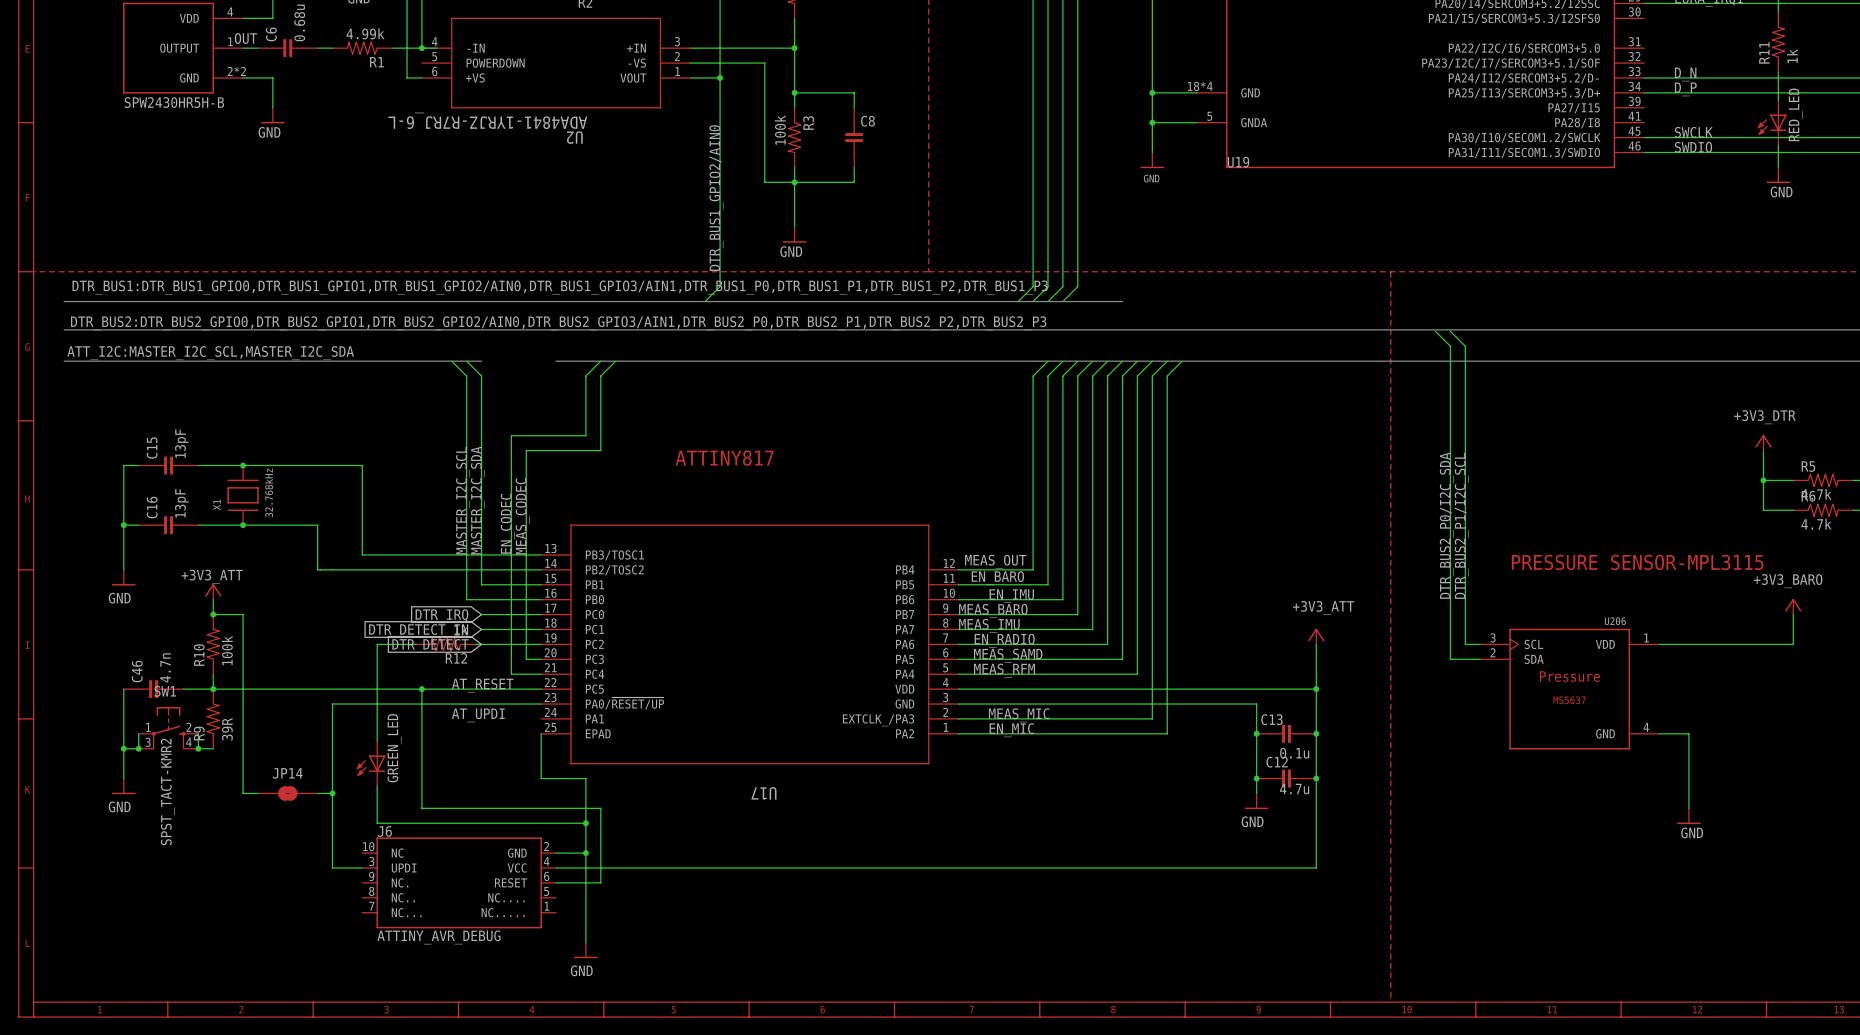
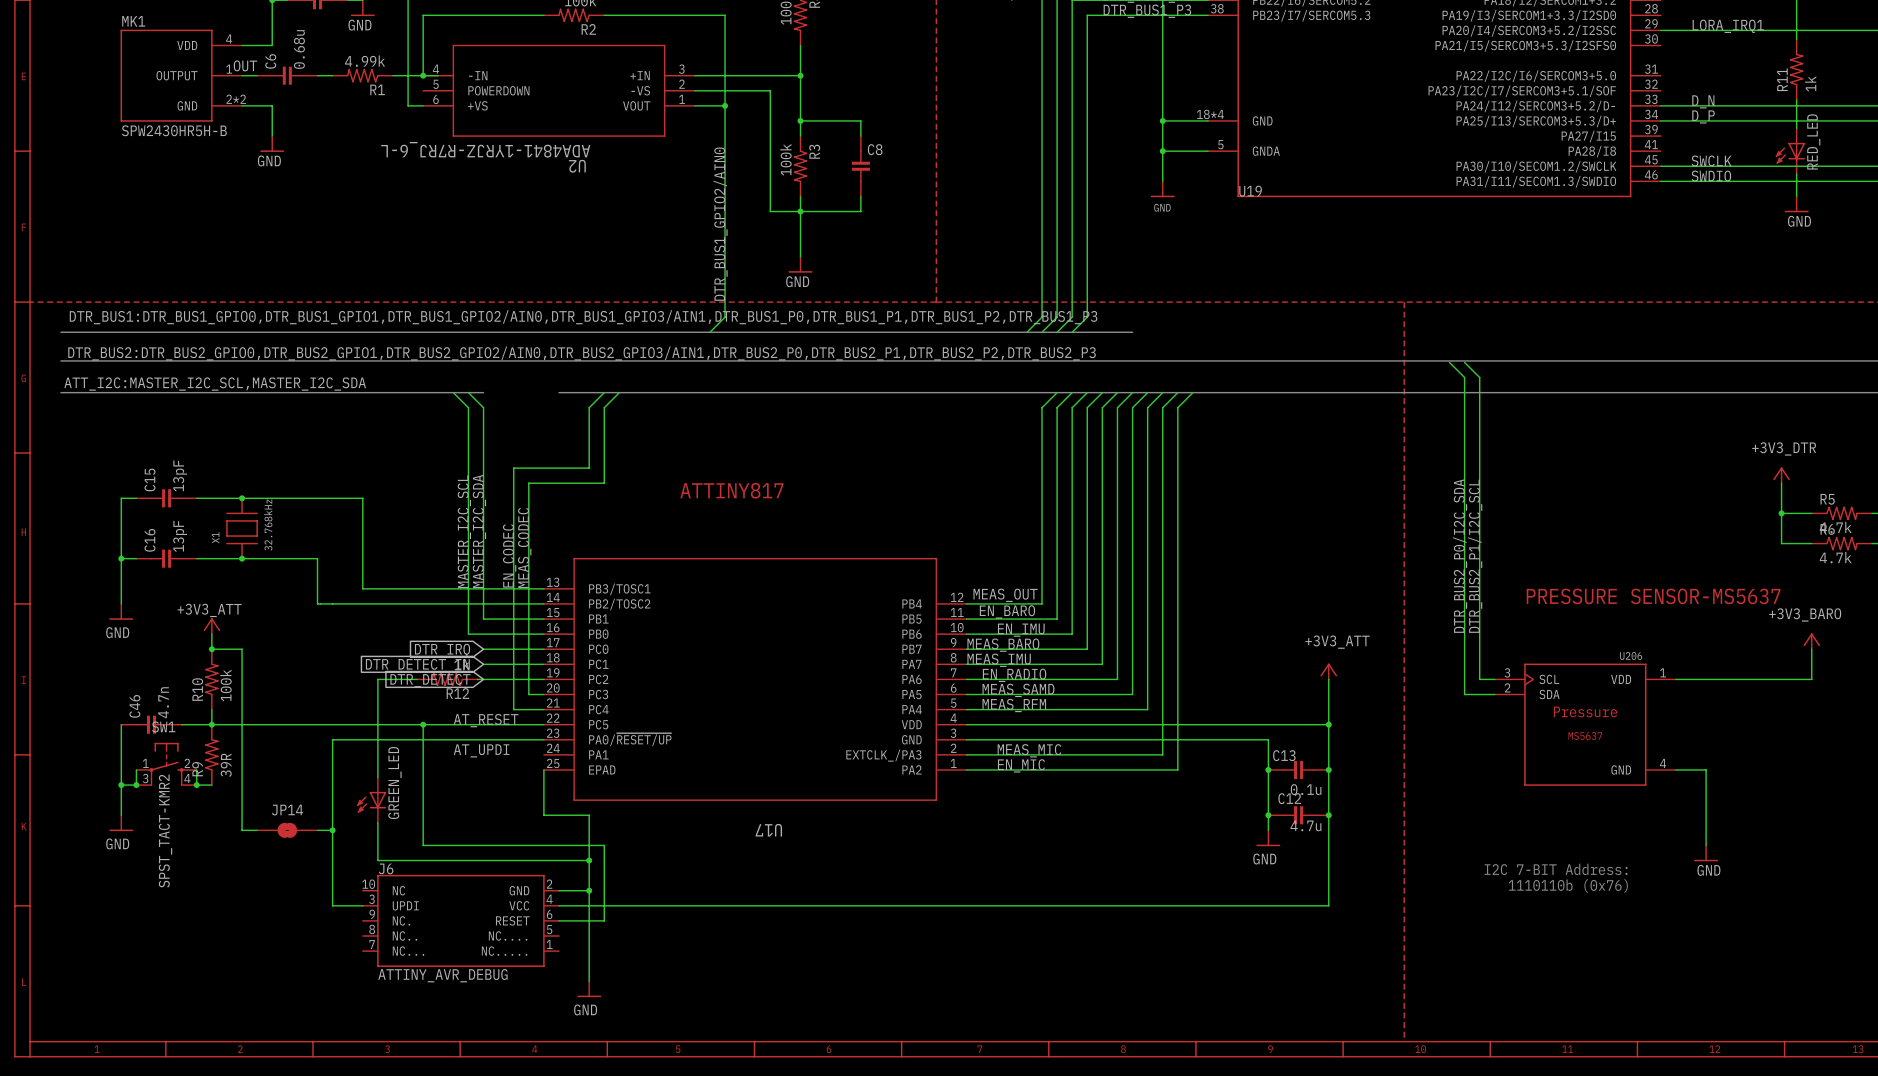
text: PRESSURE SENSOR-MPL3115 (1637, 562) -> PRESSURE SENSOR-MS5637 (1653, 596)
text: none -> I2C 7-BIT Address: (1556, 869)
text: none -> 1110110b (0x76) (1568, 886)

